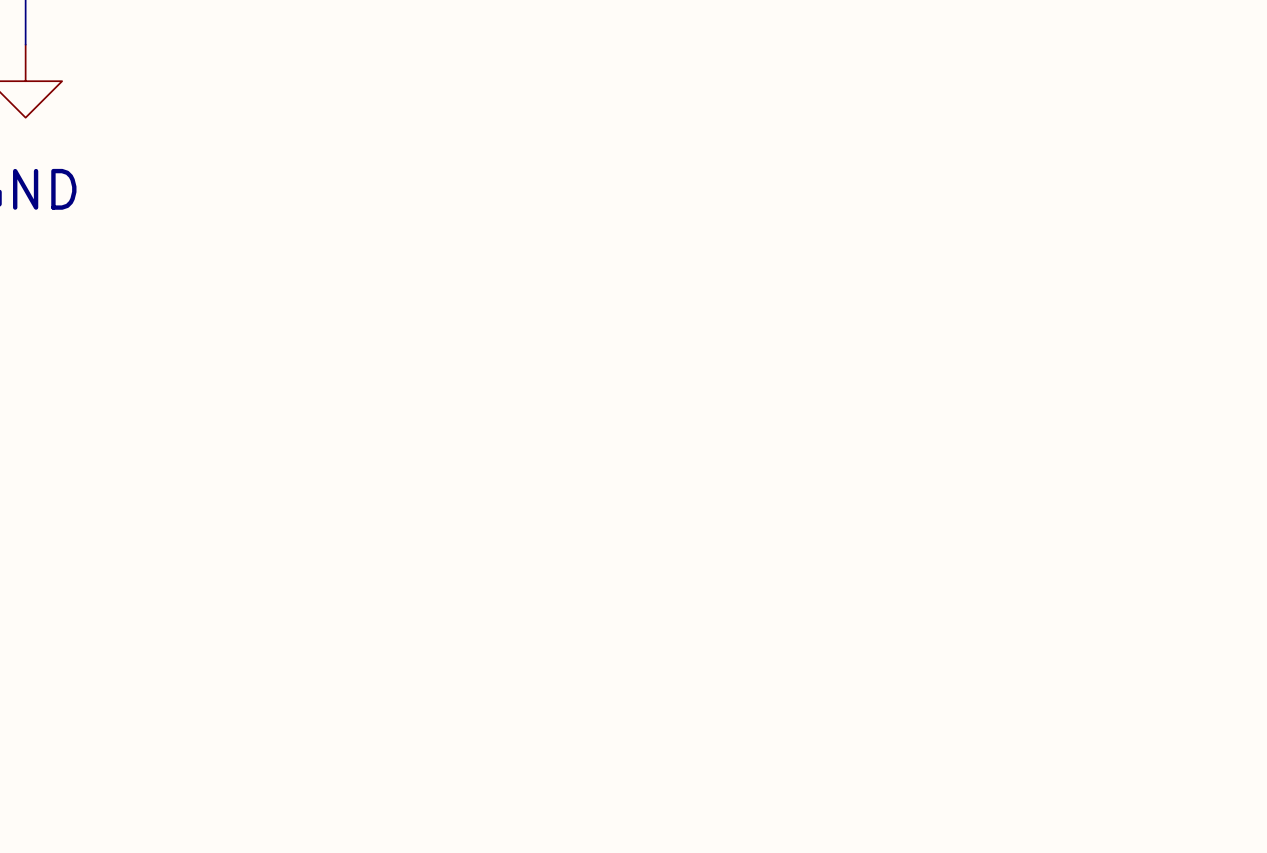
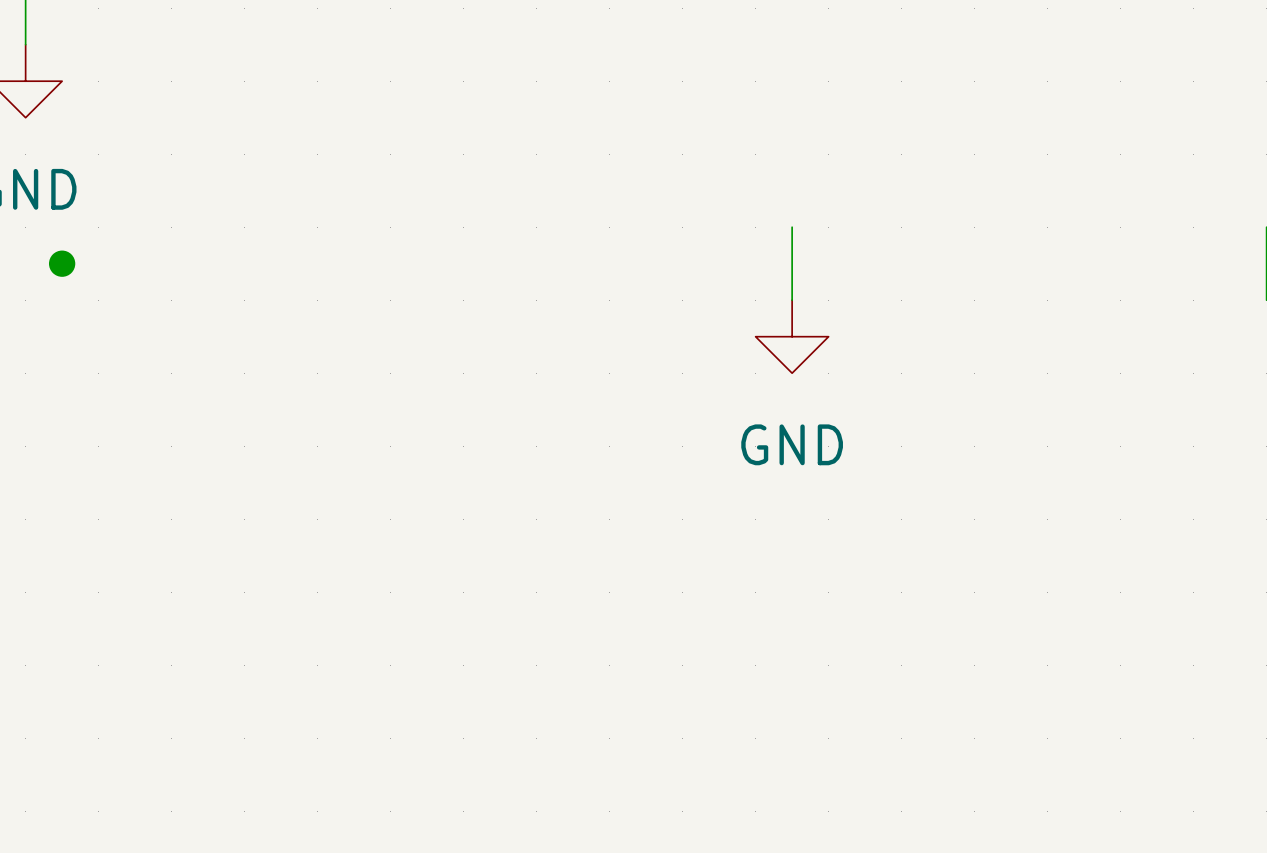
wire: none -> (792, 227) (792, 300)
wire: none -> (1266, 227) (1266, 300)
junction: none -> (62, 263)
power symbol: none -> GND (792, 336)

